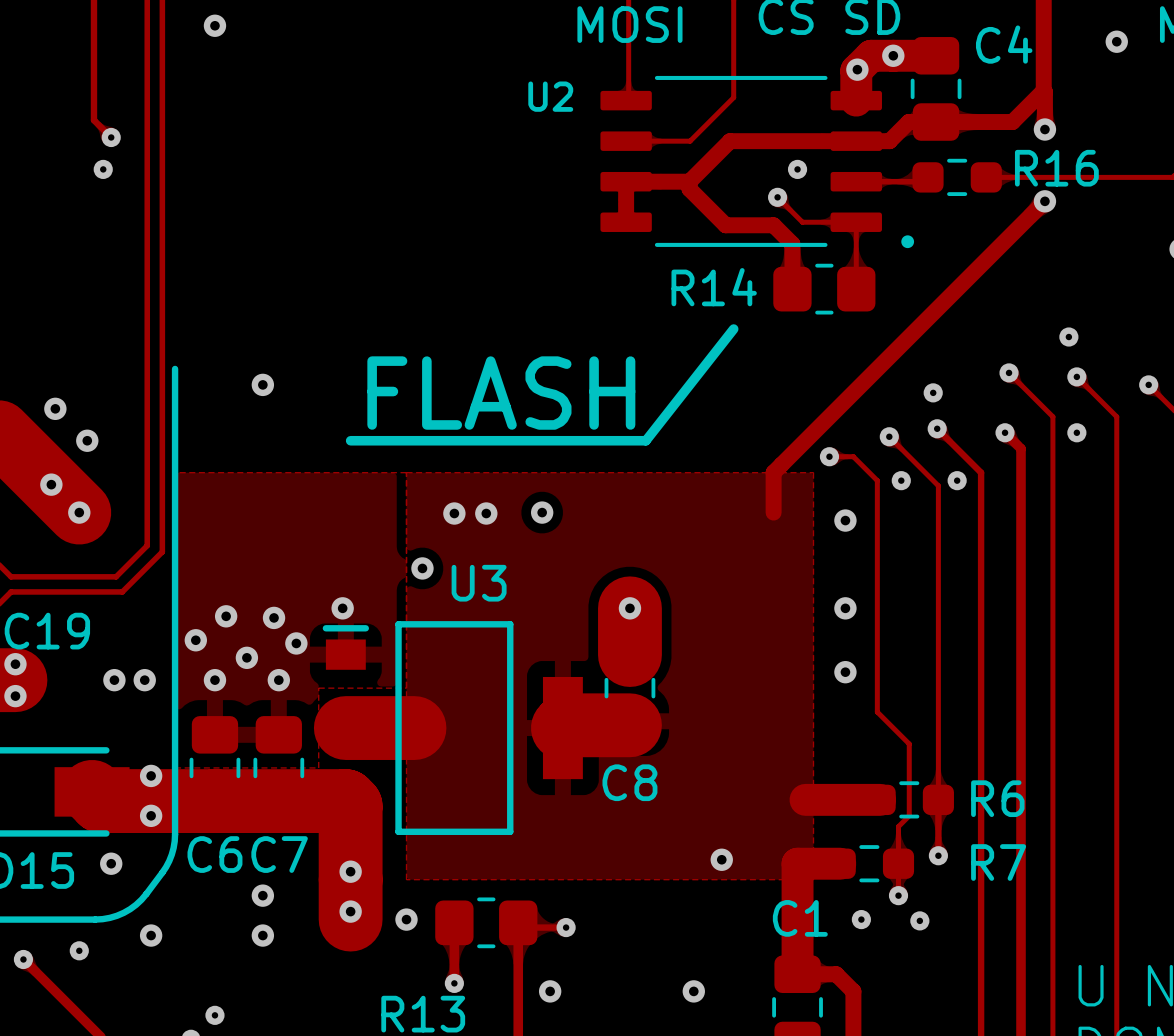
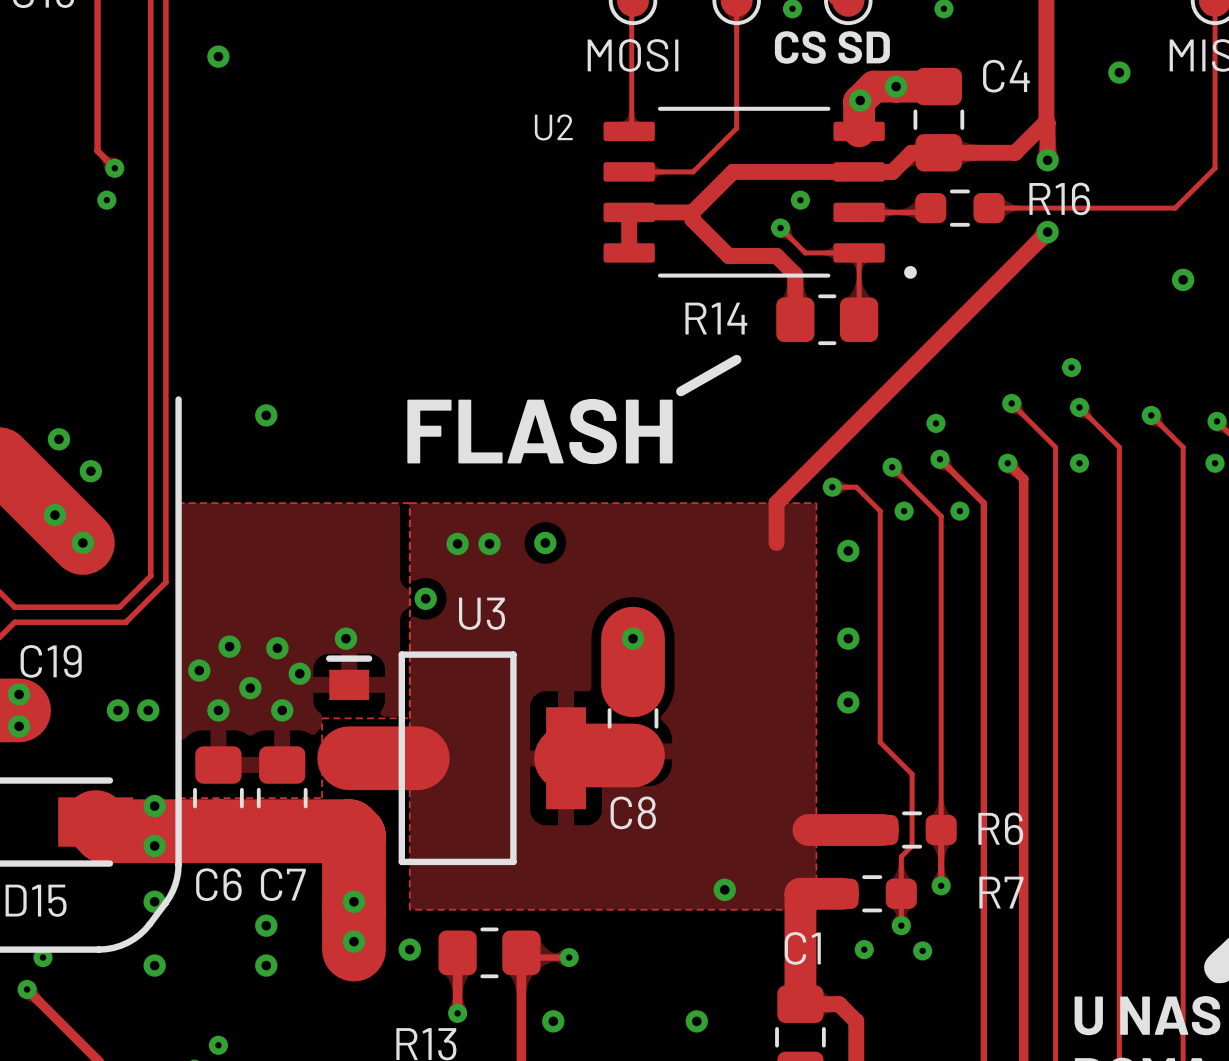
line: (733, 329) (645, 440) (350, 440) -> (736, 359) (680, 391)
text position: FLASH (501, 393) -> FLASH (539, 431)
via position: (111, 863) -> (154, 901)
via position: (79, 950) -> (43, 957)

